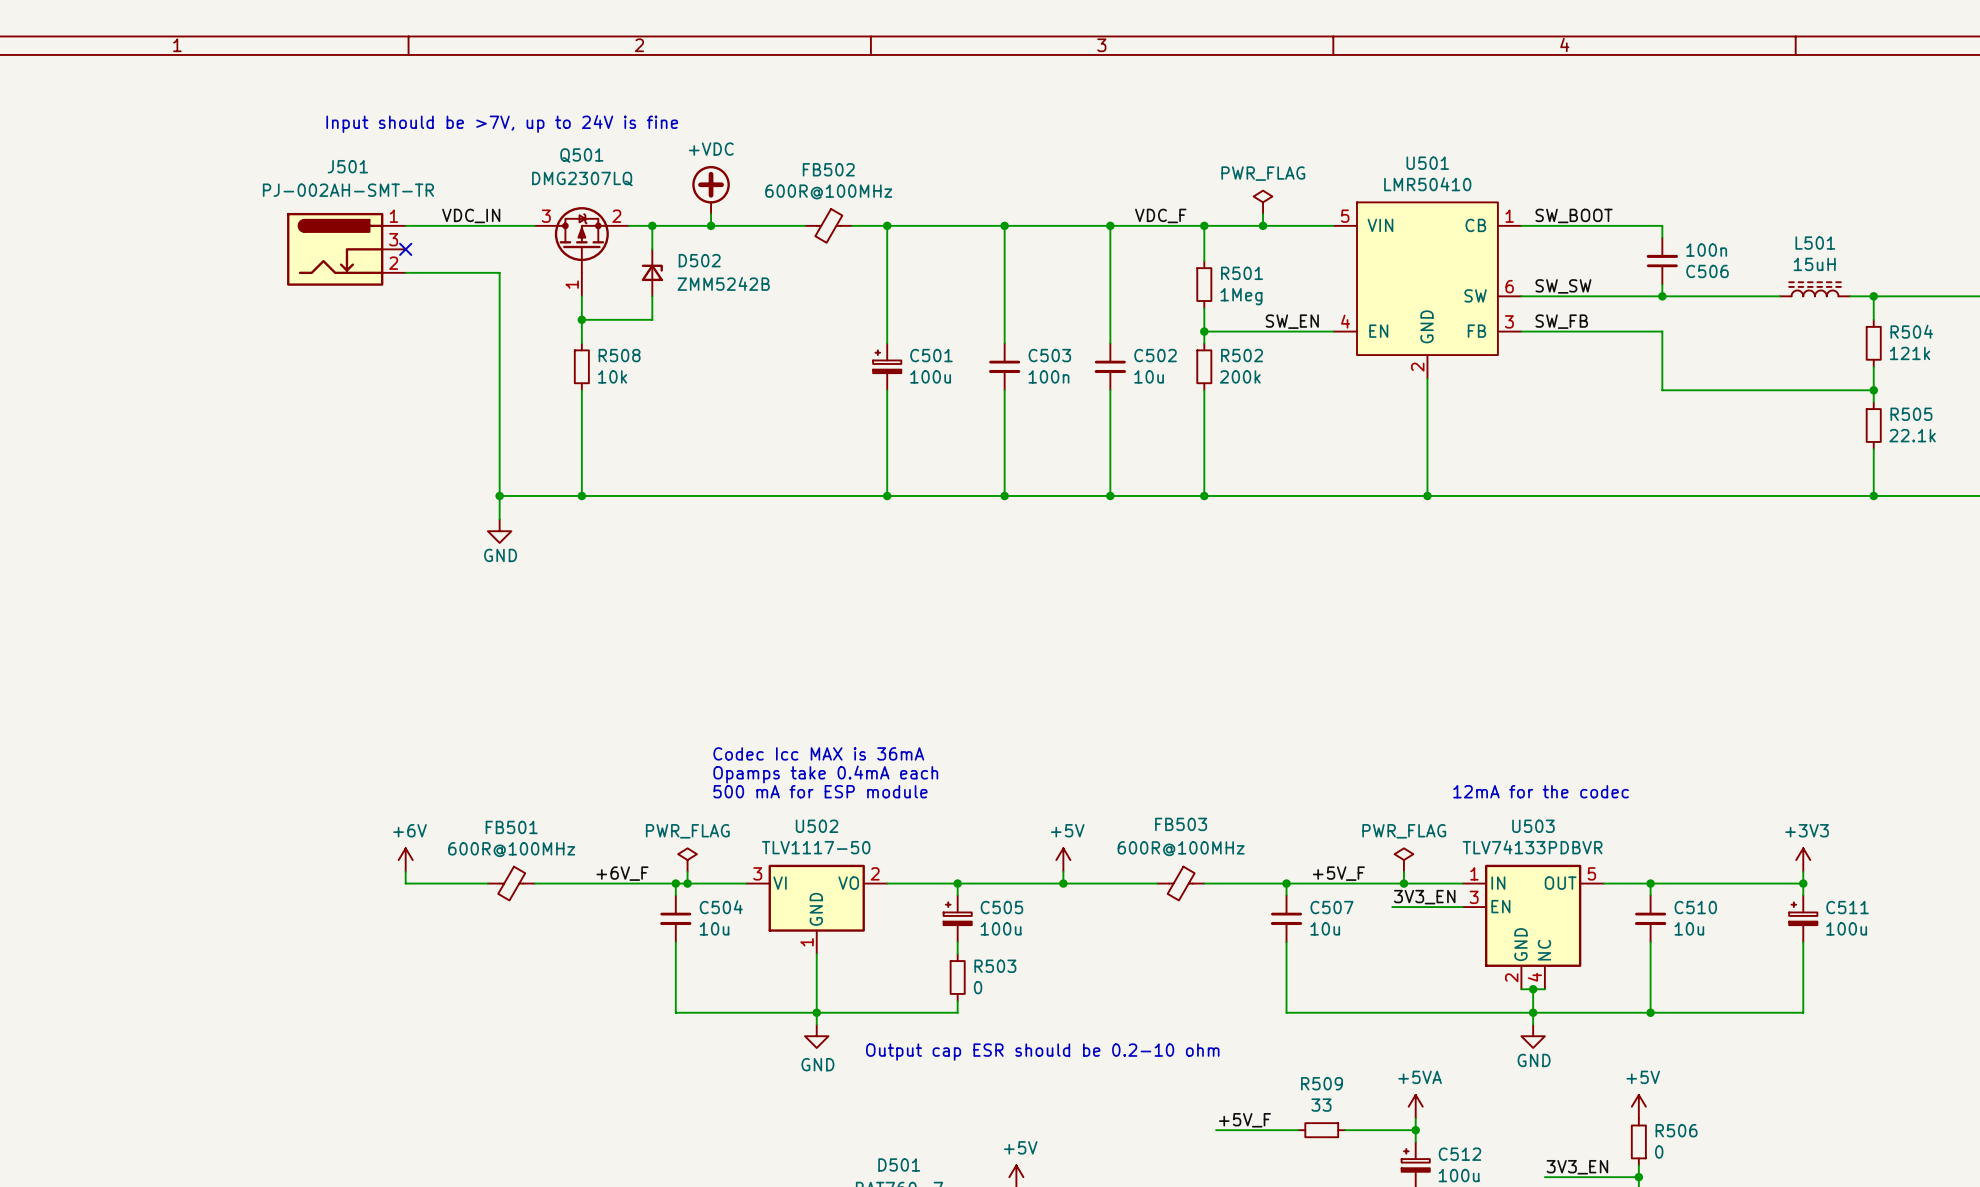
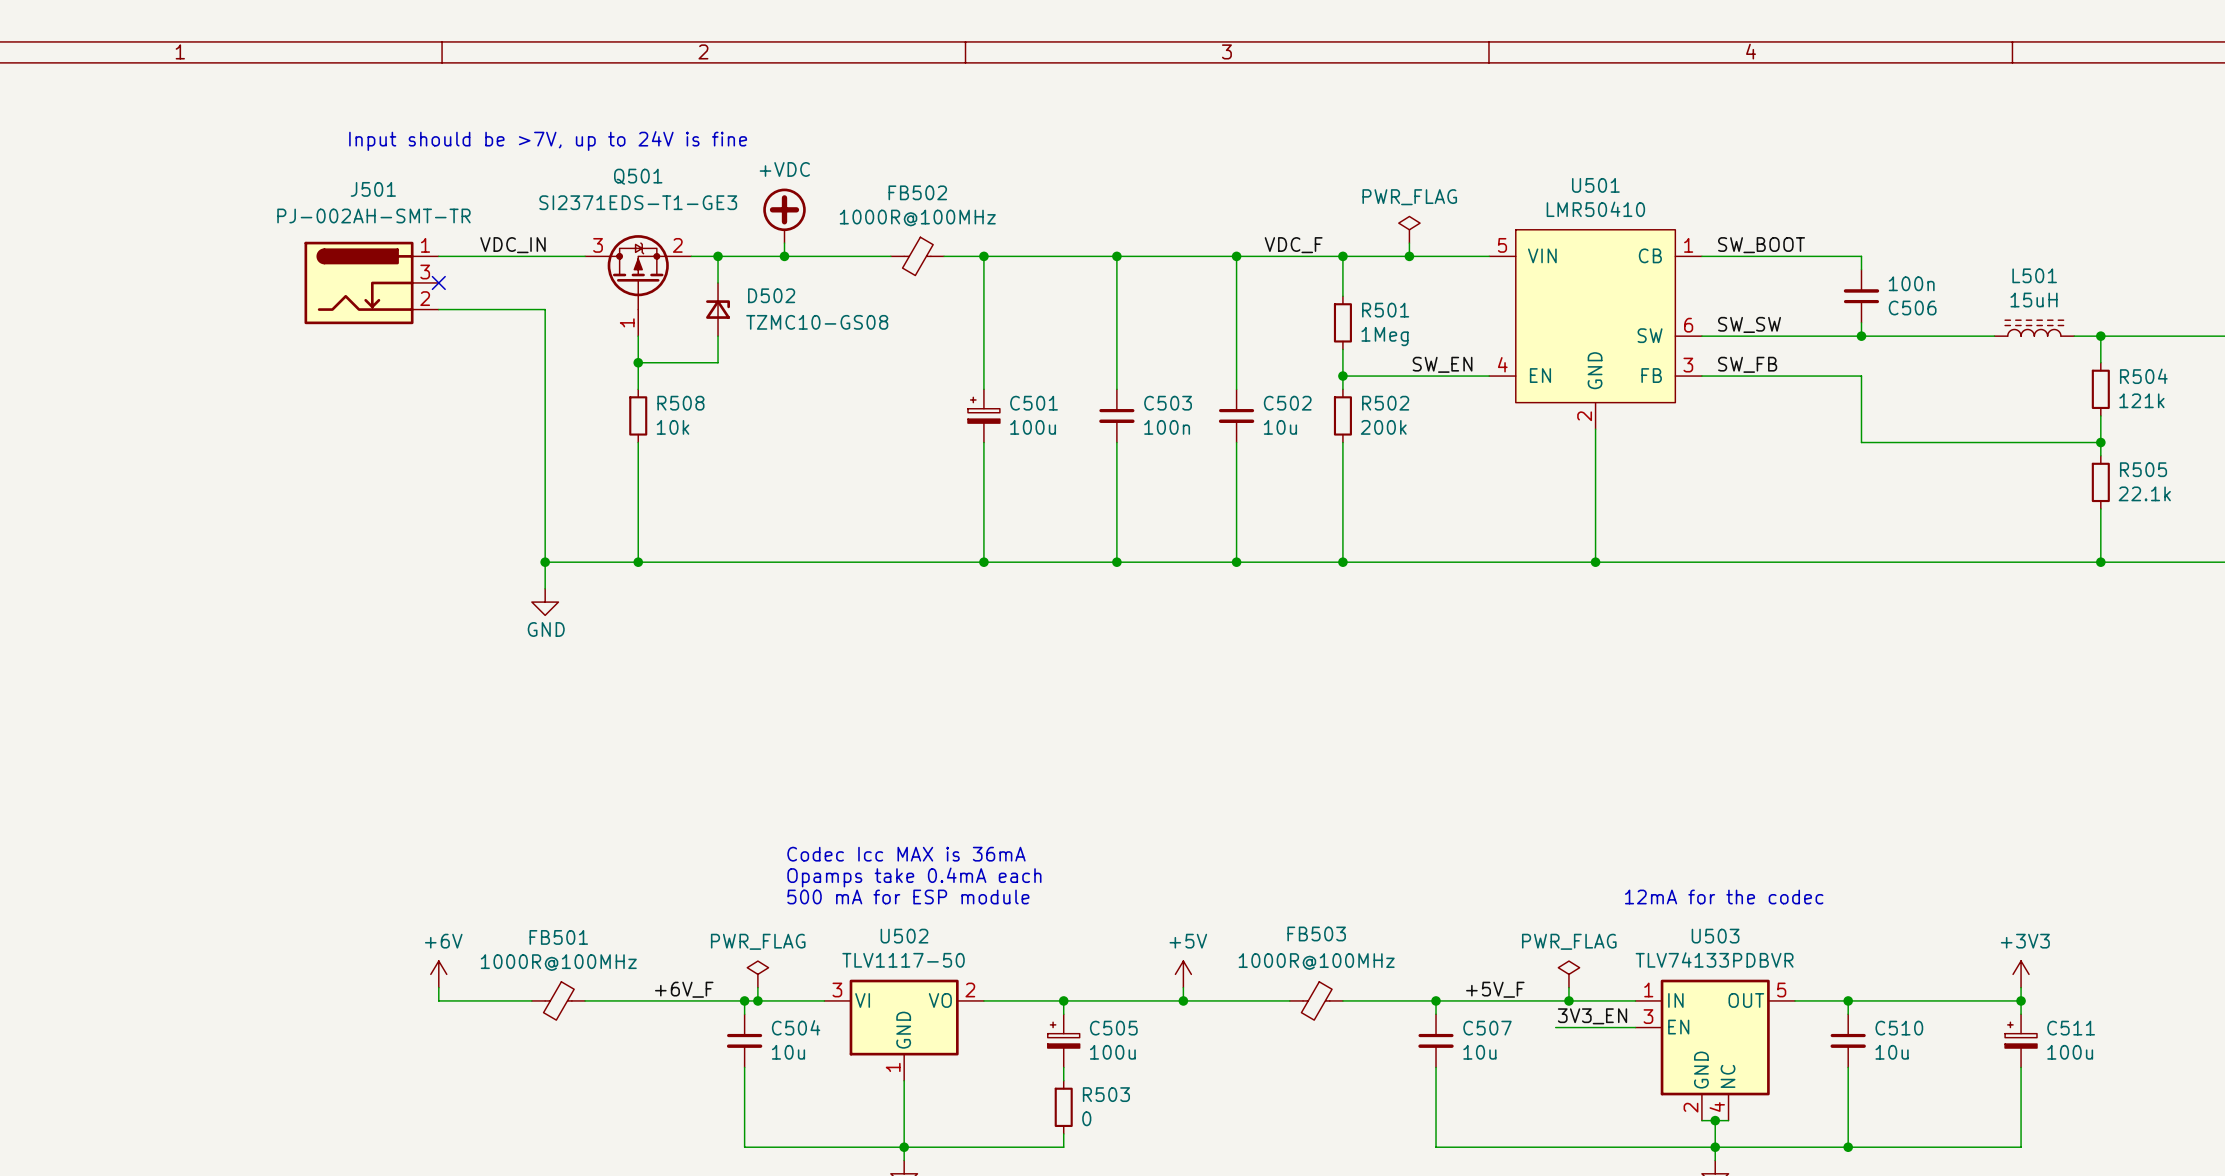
Q501 value: DMG2307LQ (582, 179) -> SI2371EDS-T1-GE3 (638, 202)
FB502 value: 600R@100MHz (828, 191) -> 1000R@100MHz (917, 218)
D502 value: ZMM5242B (723, 283) -> TZMC10-GS08 (817, 322)
FB503 value: 600R@100MHz (1181, 848) -> 1000R@100MHz (1316, 961)
FB501 value: 600R@100MHz (511, 849) -> 1000R@100MHz (558, 962)

